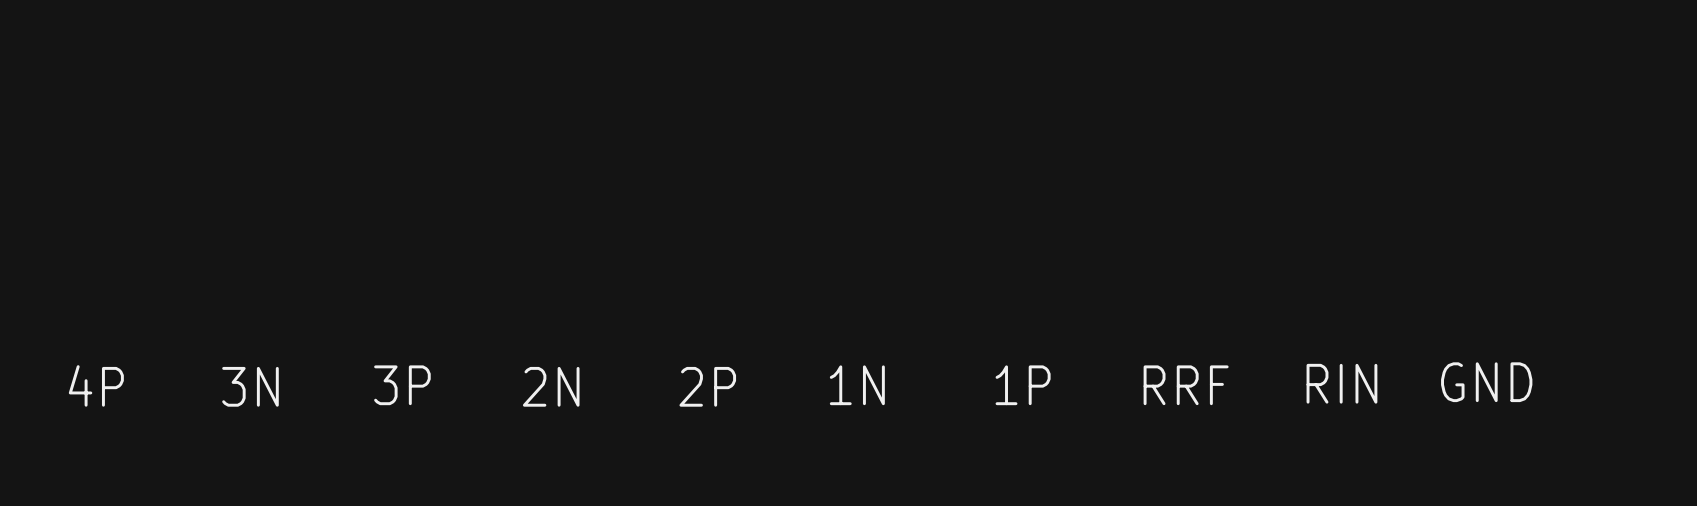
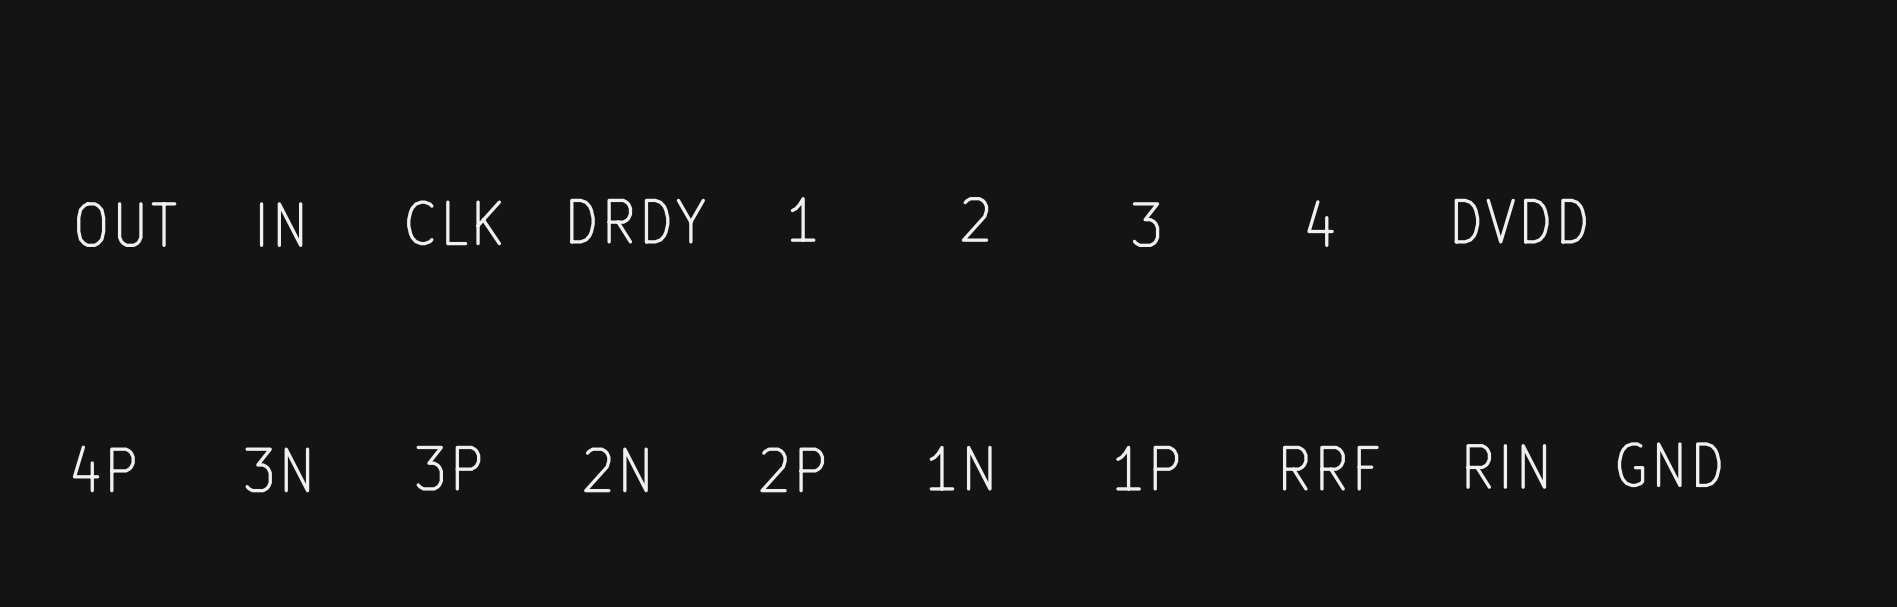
text: none -> 1 (803, 219)
text: none -> 2 (974, 219)
text: none -> DRDY (637, 221)
text: none -> DVDD (1520, 221)
text: none -> CLK (454, 222)
text: none -> OUT (126, 224)
text: none -> IN (281, 224)
text: none -> 3 (1146, 224)
text: none -> 4 (1320, 223)

